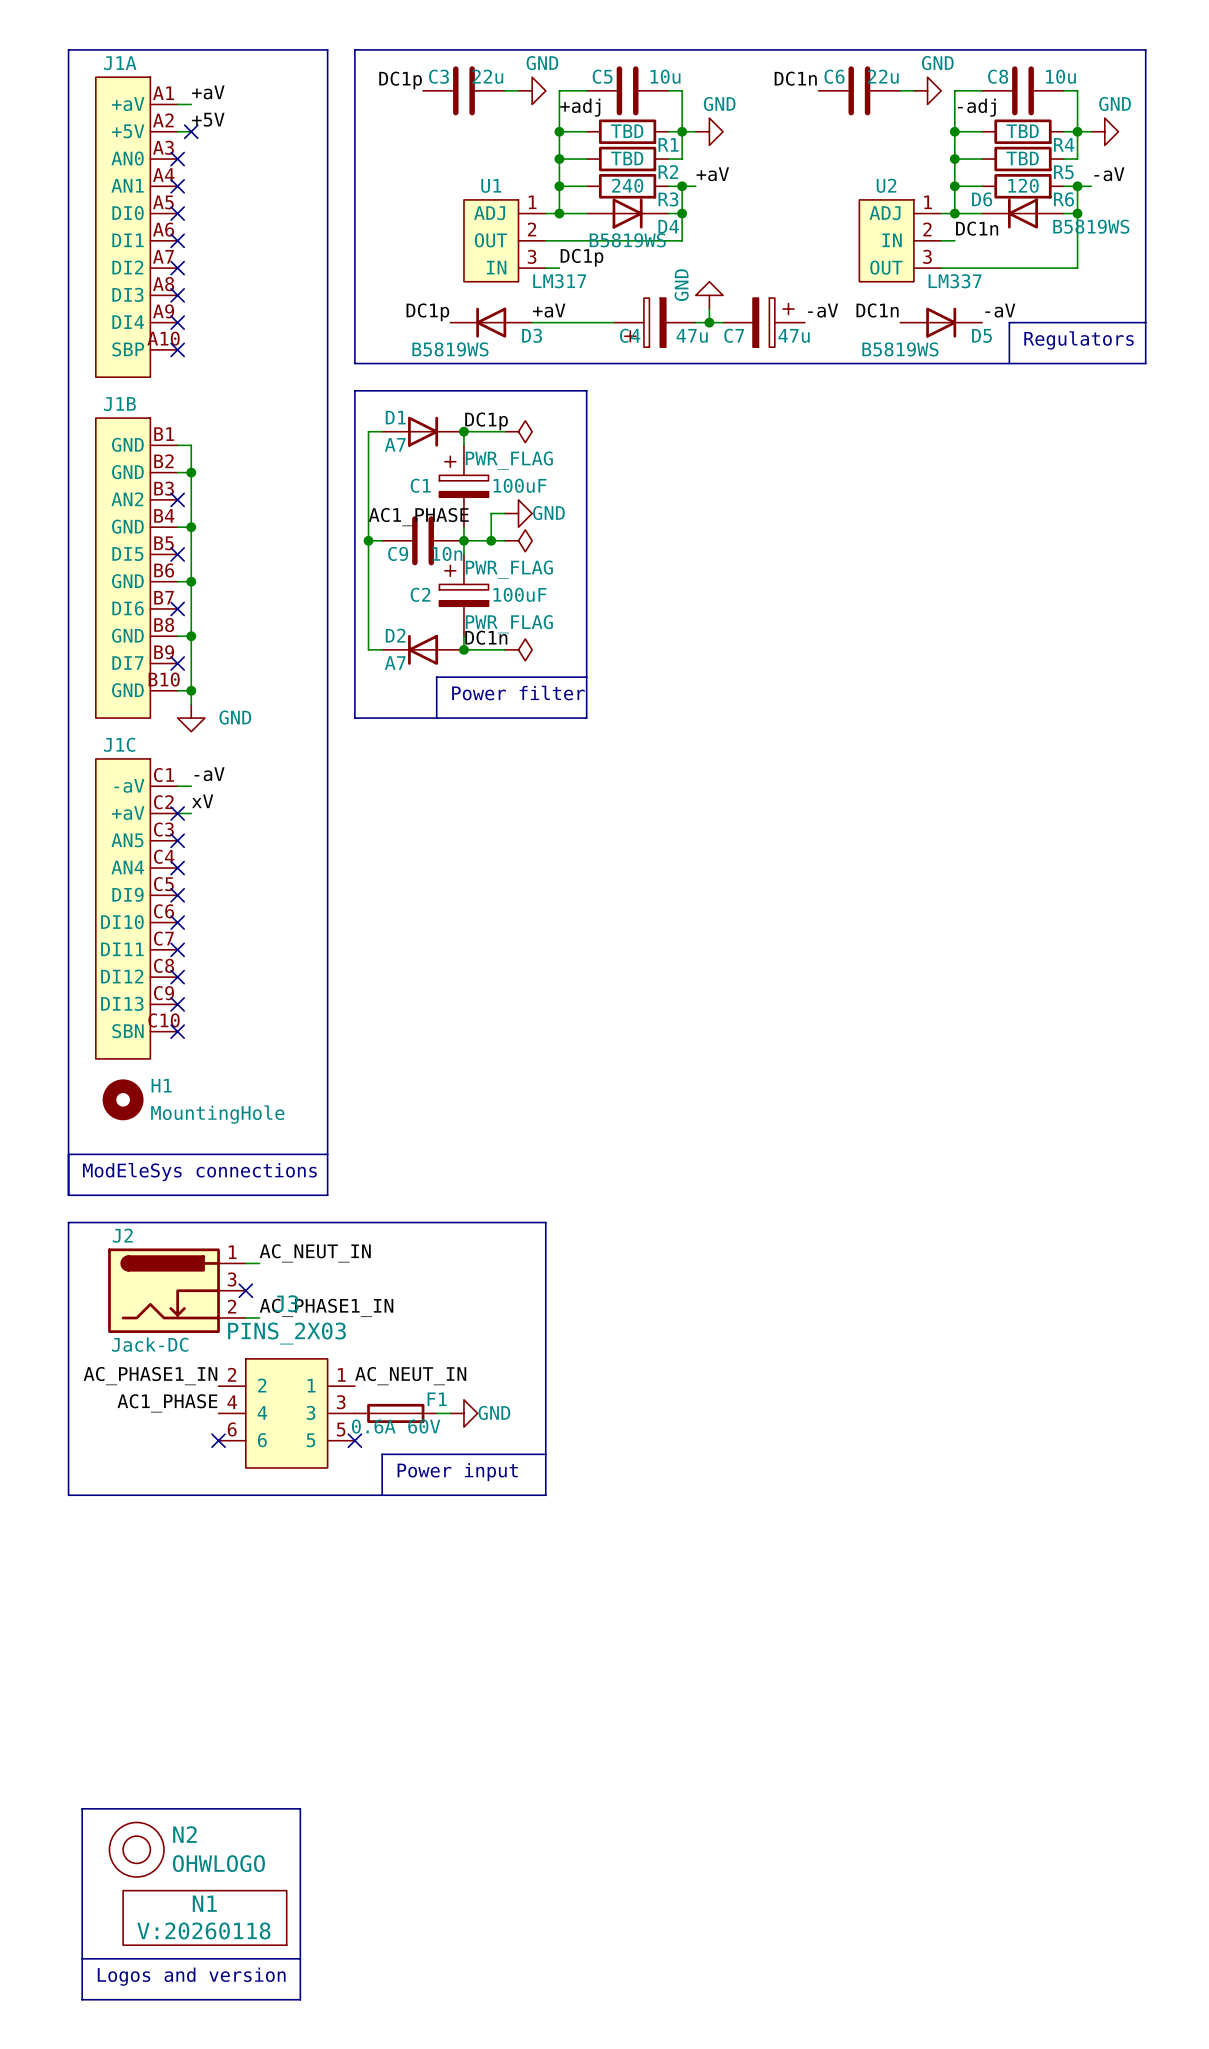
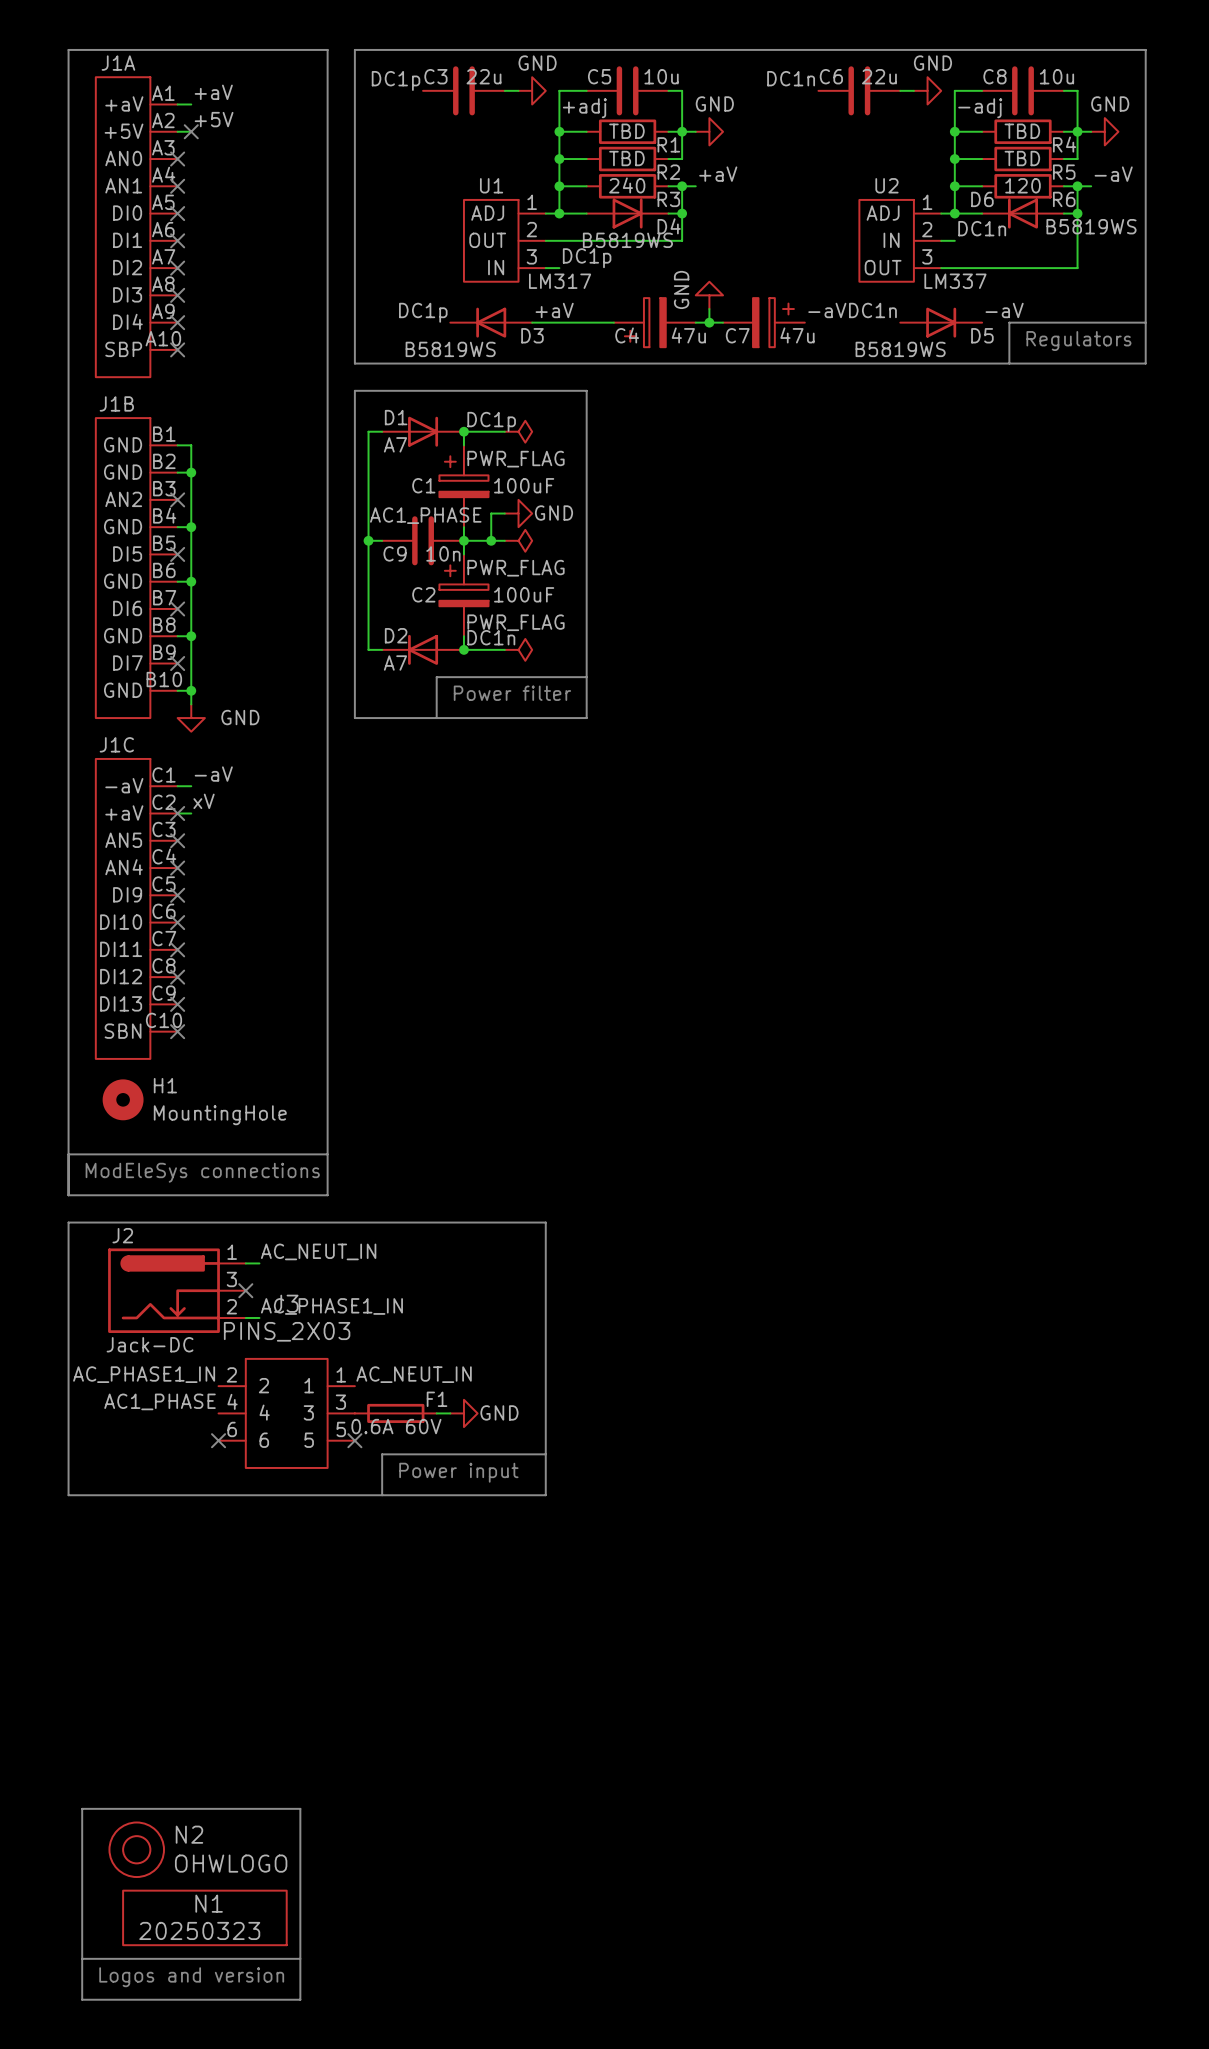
N1 value: V:20260118 (203, 1930) -> 20250323 (199, 1930)

